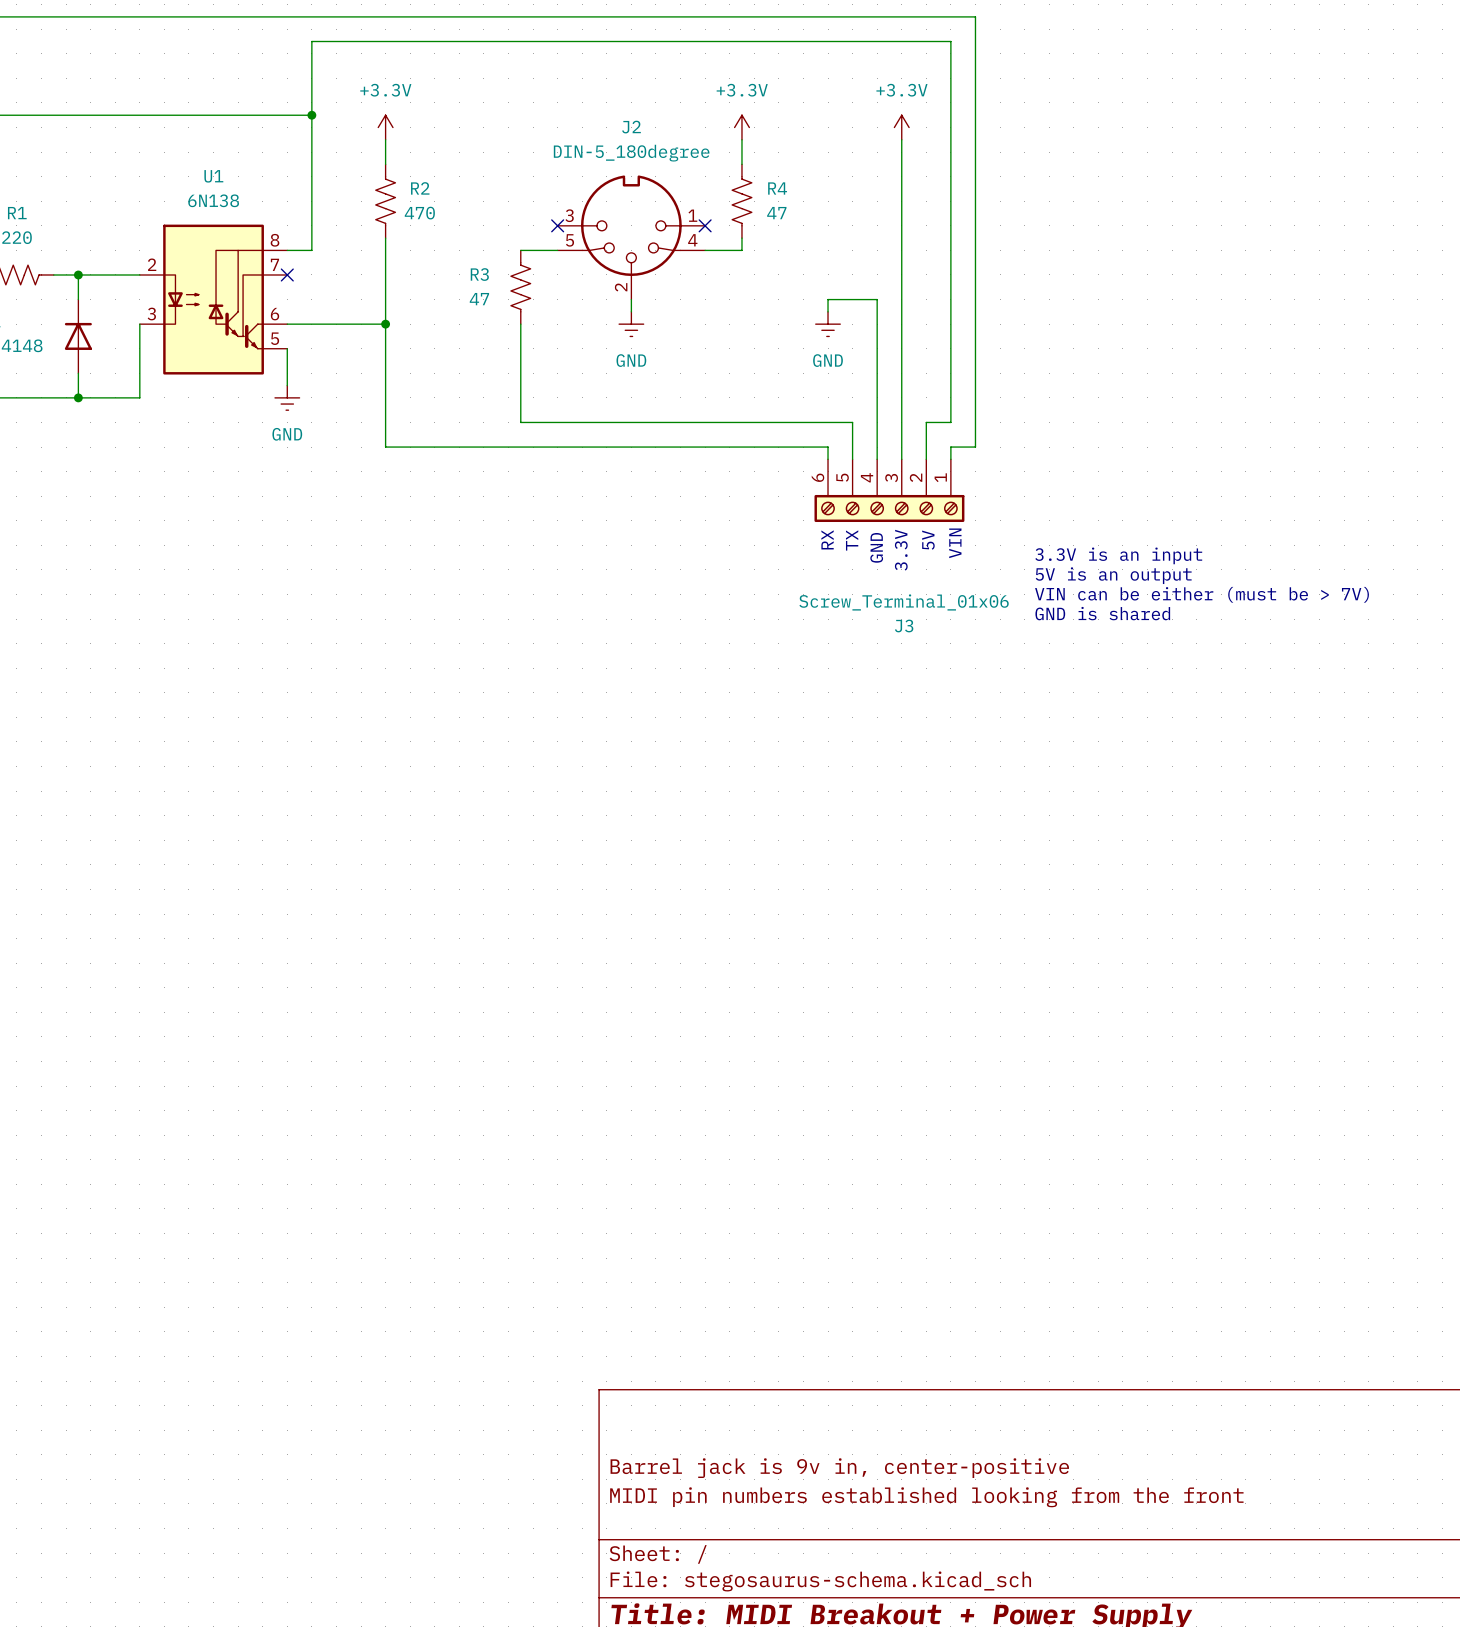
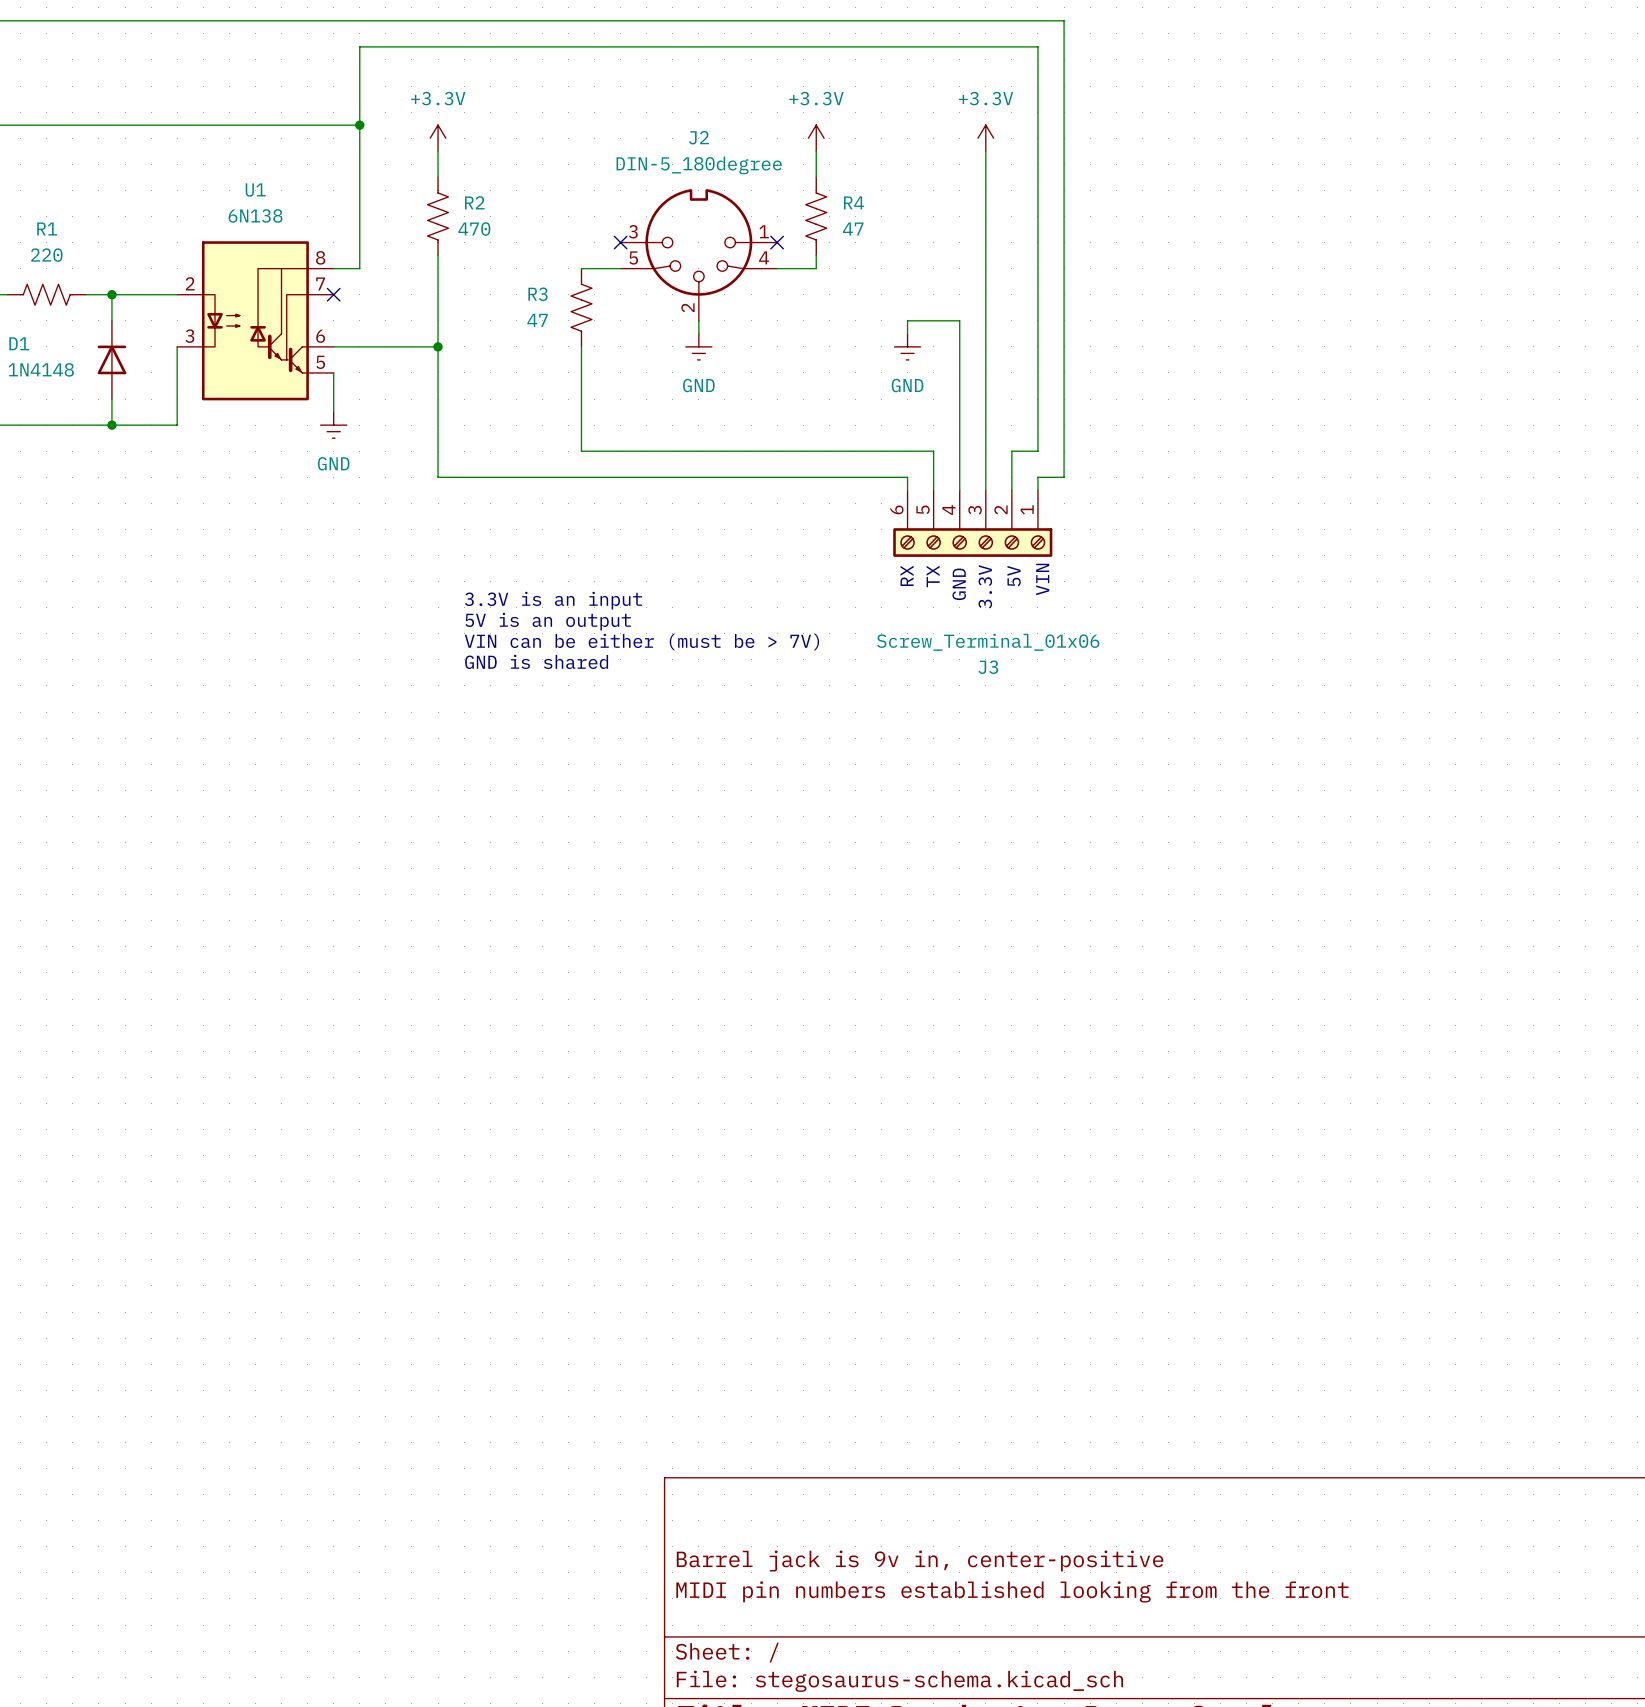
text: 3.3V is an input (1118, 555) -> none
text: none -> 3.3V is an input (553, 600)
text: 5V is an output (1113, 575) -> none
text: none -> 5V is an output (548, 621)
text: VIN can be either (must be > 7V) (1202, 594) -> none
text: none -> VIN can be either (must be > 7V) (641, 641)
text: GND is shared (1102, 613) -> none
text: none -> GND is shared (536, 661)

